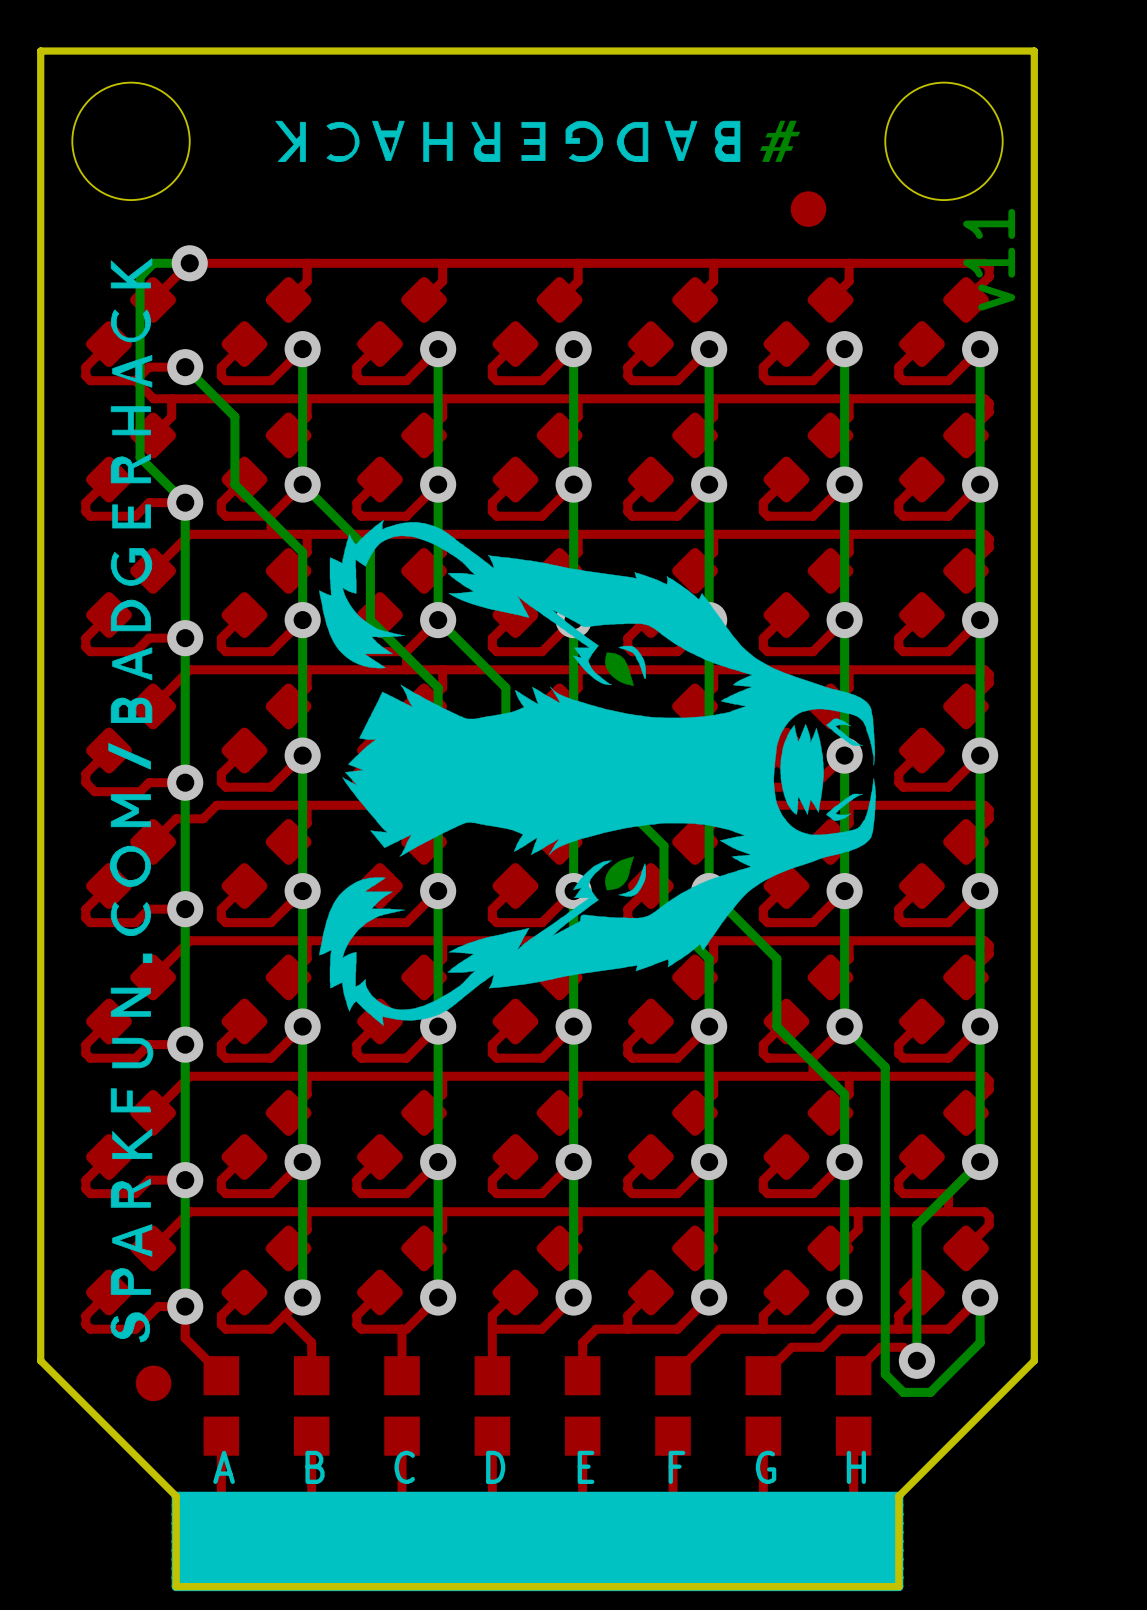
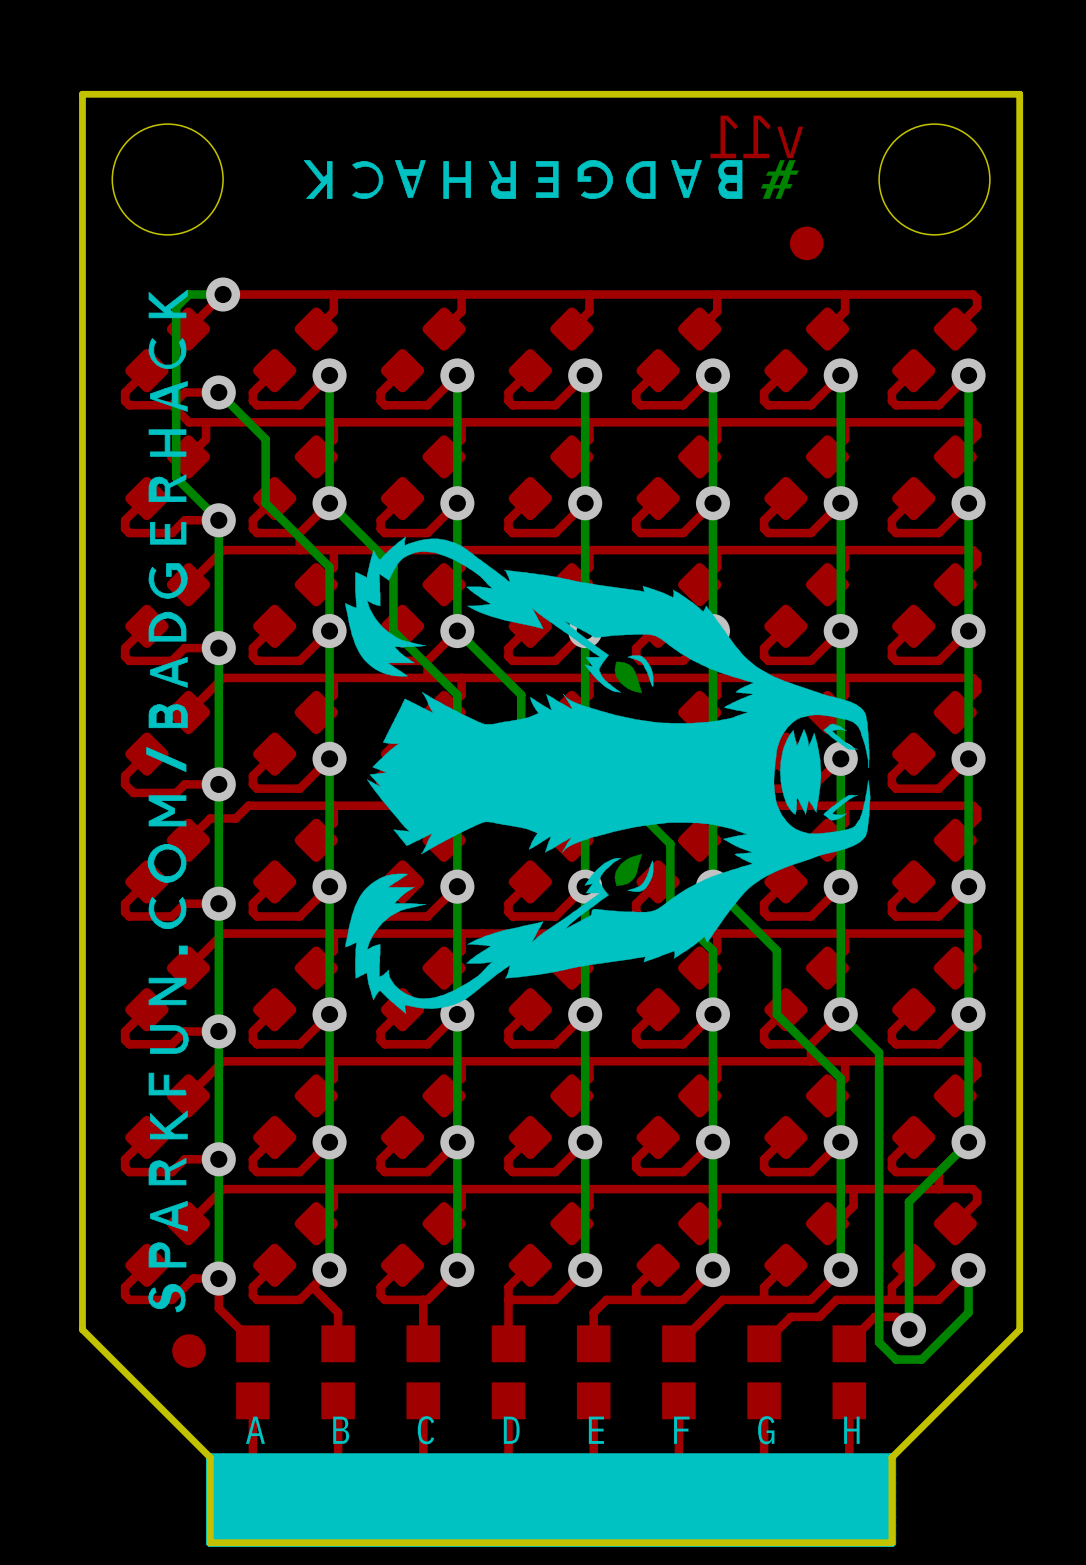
drawing position: (989, 259) -> (756, 136)

